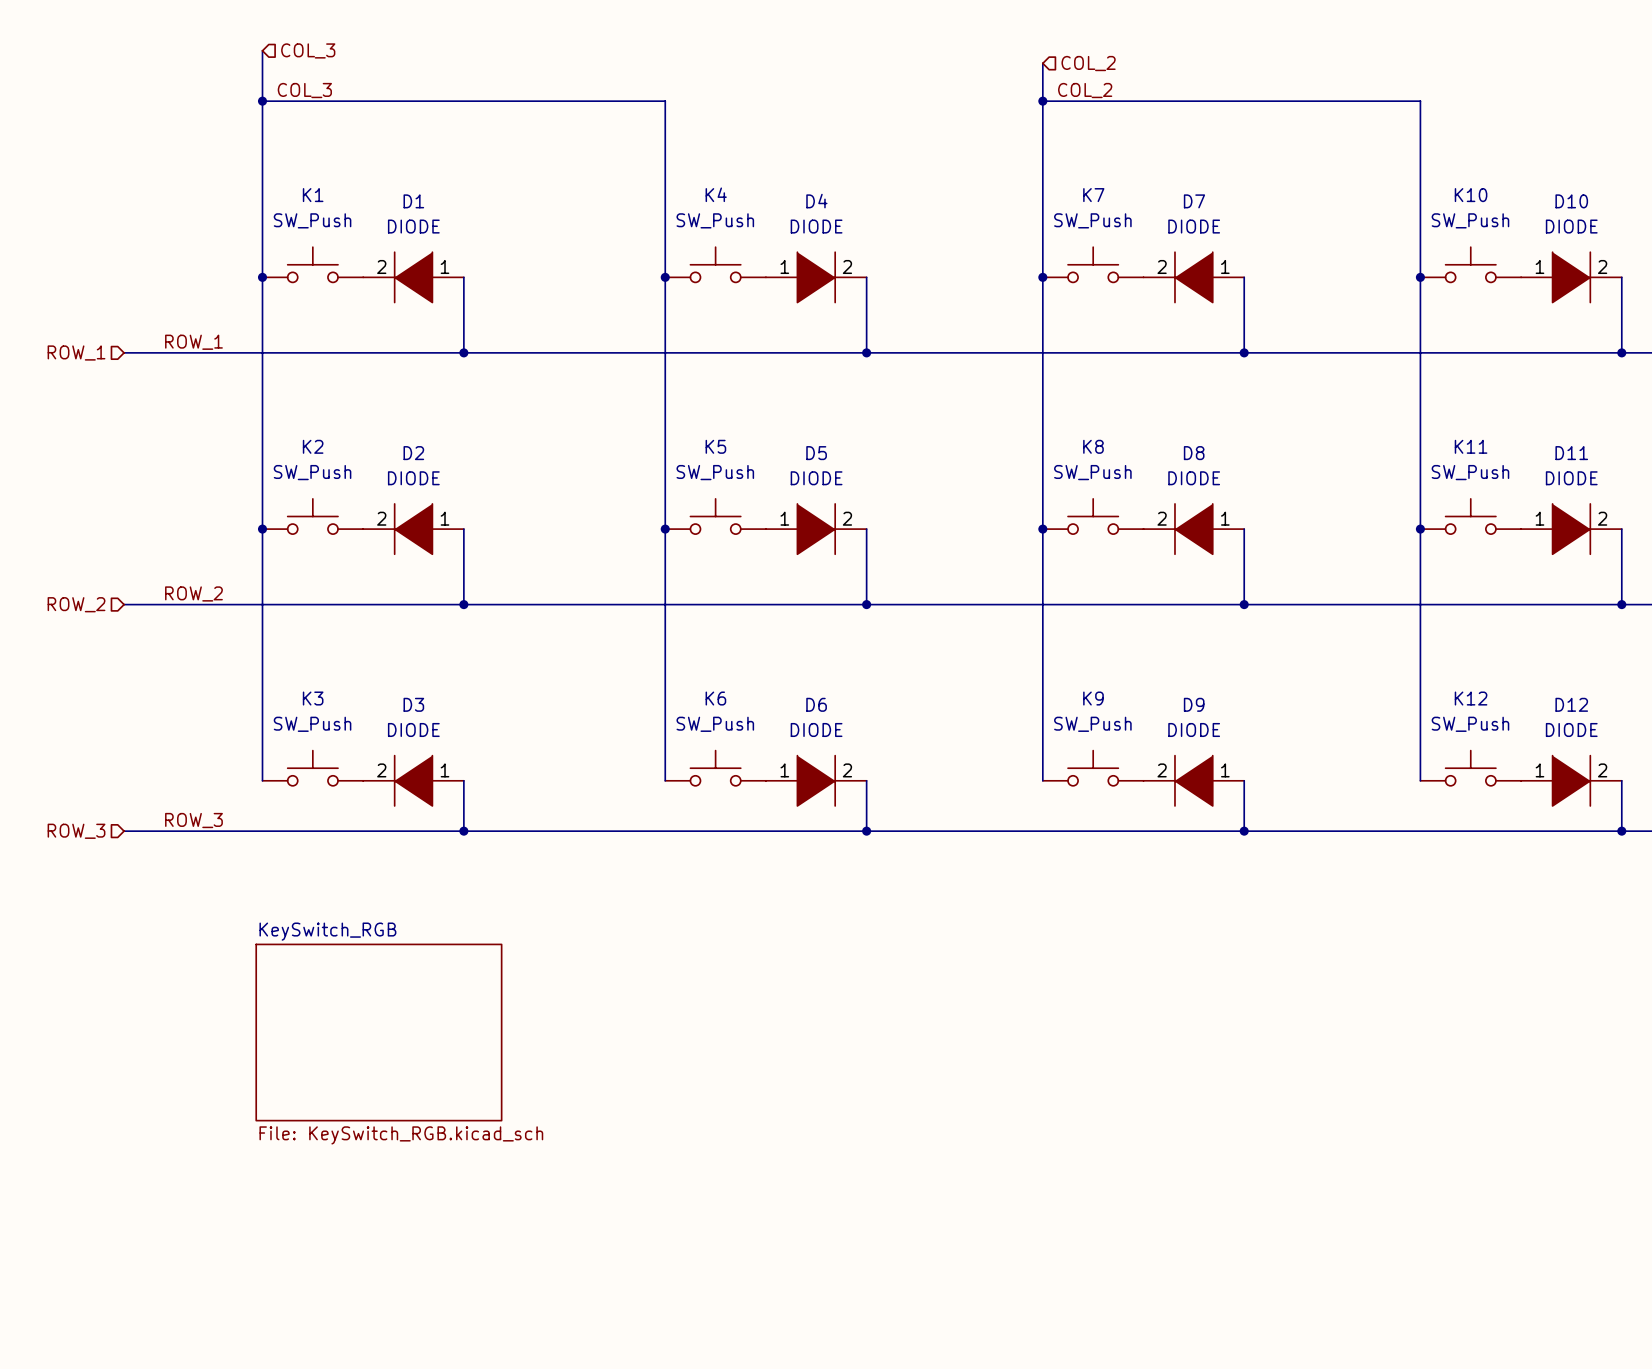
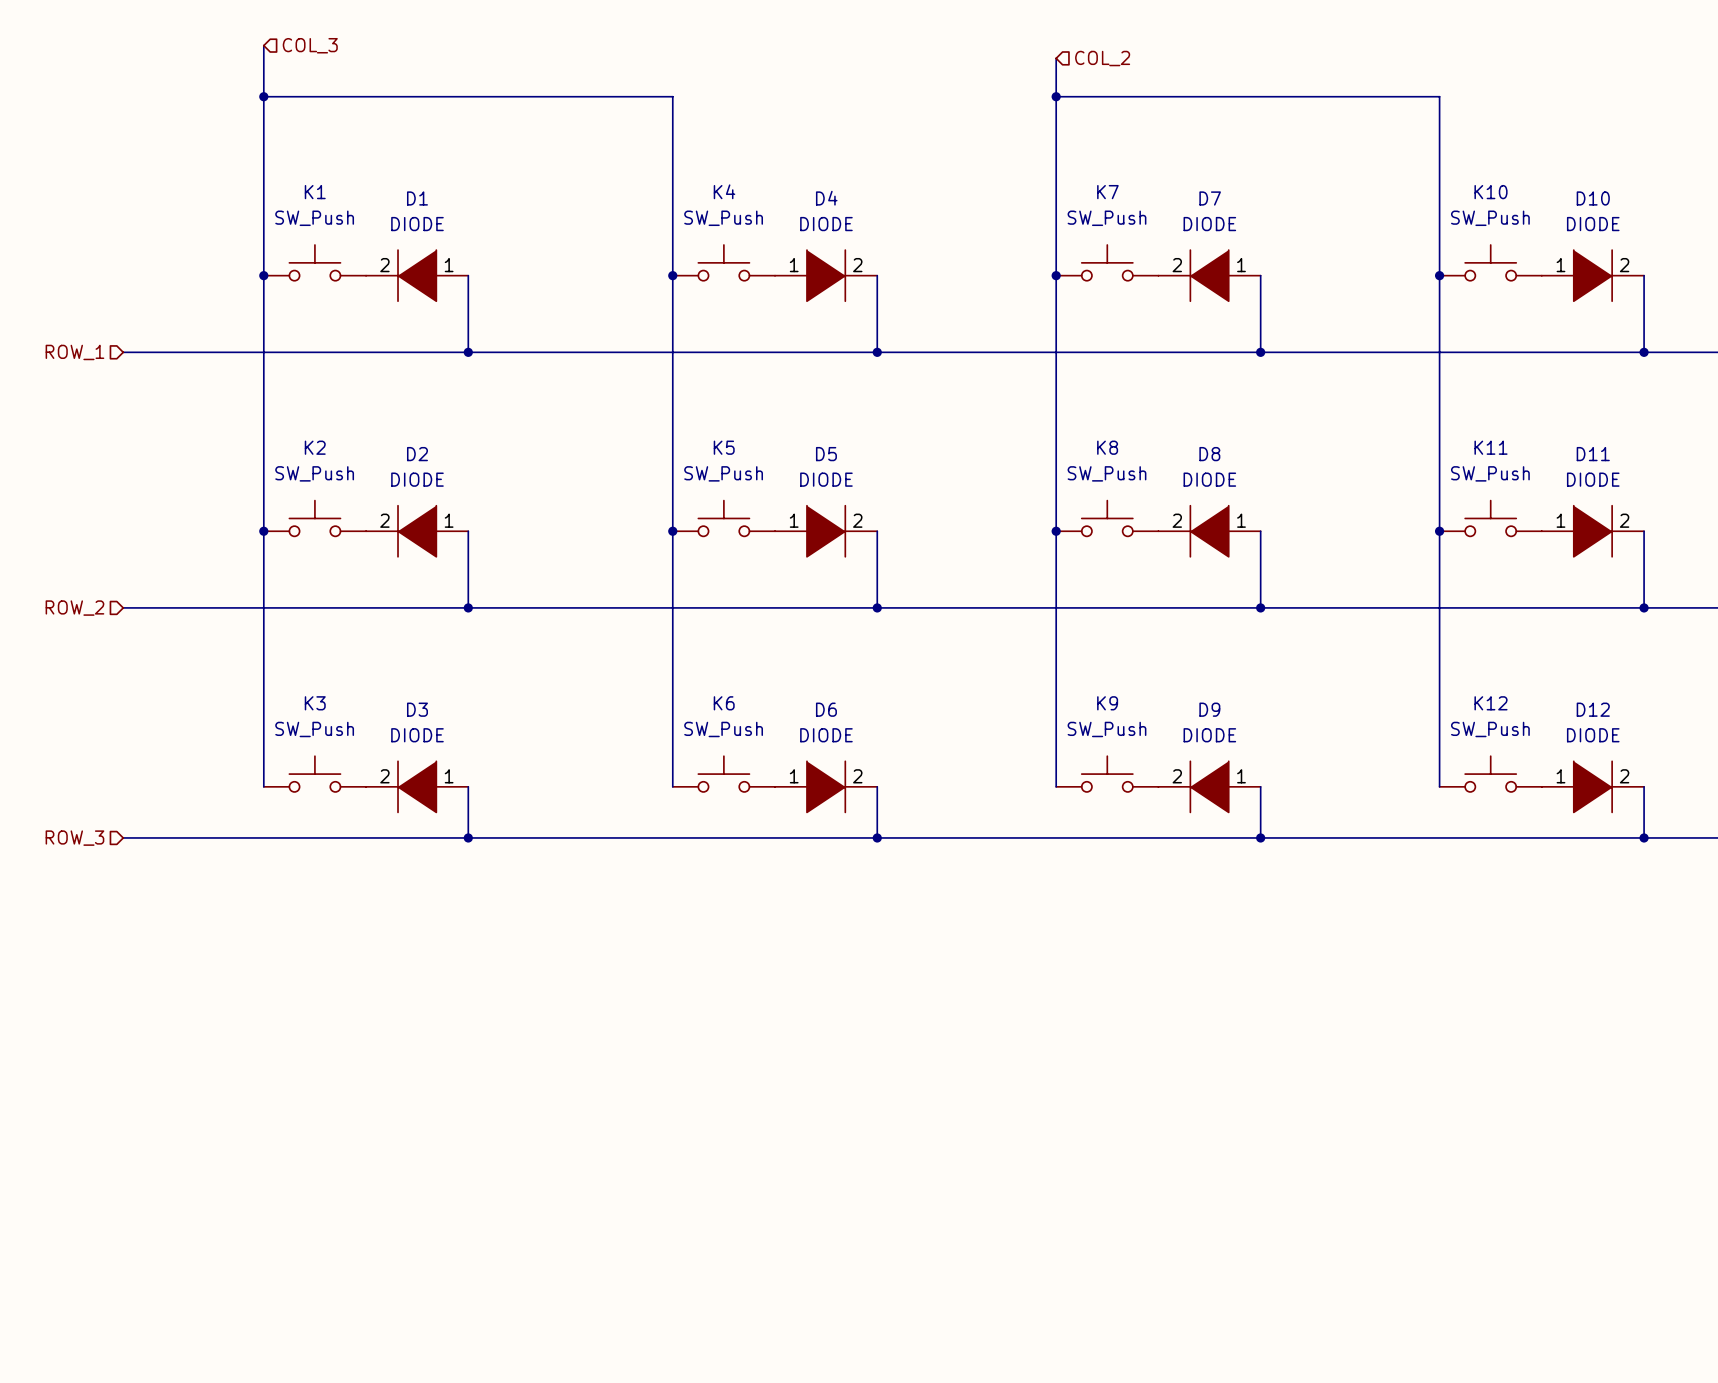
label: COL_3 (304, 90) -> none
label: COL_2 (1085, 90) -> none
label: ROW_1 (193, 342) -> none
label: ROW_2 (193, 593) -> none
label: ROW_3 (193, 820) -> none
sheet KeySwitch_RGB: File: KeySwitch_RGB.kicad_sch (378, 1032) -> none

